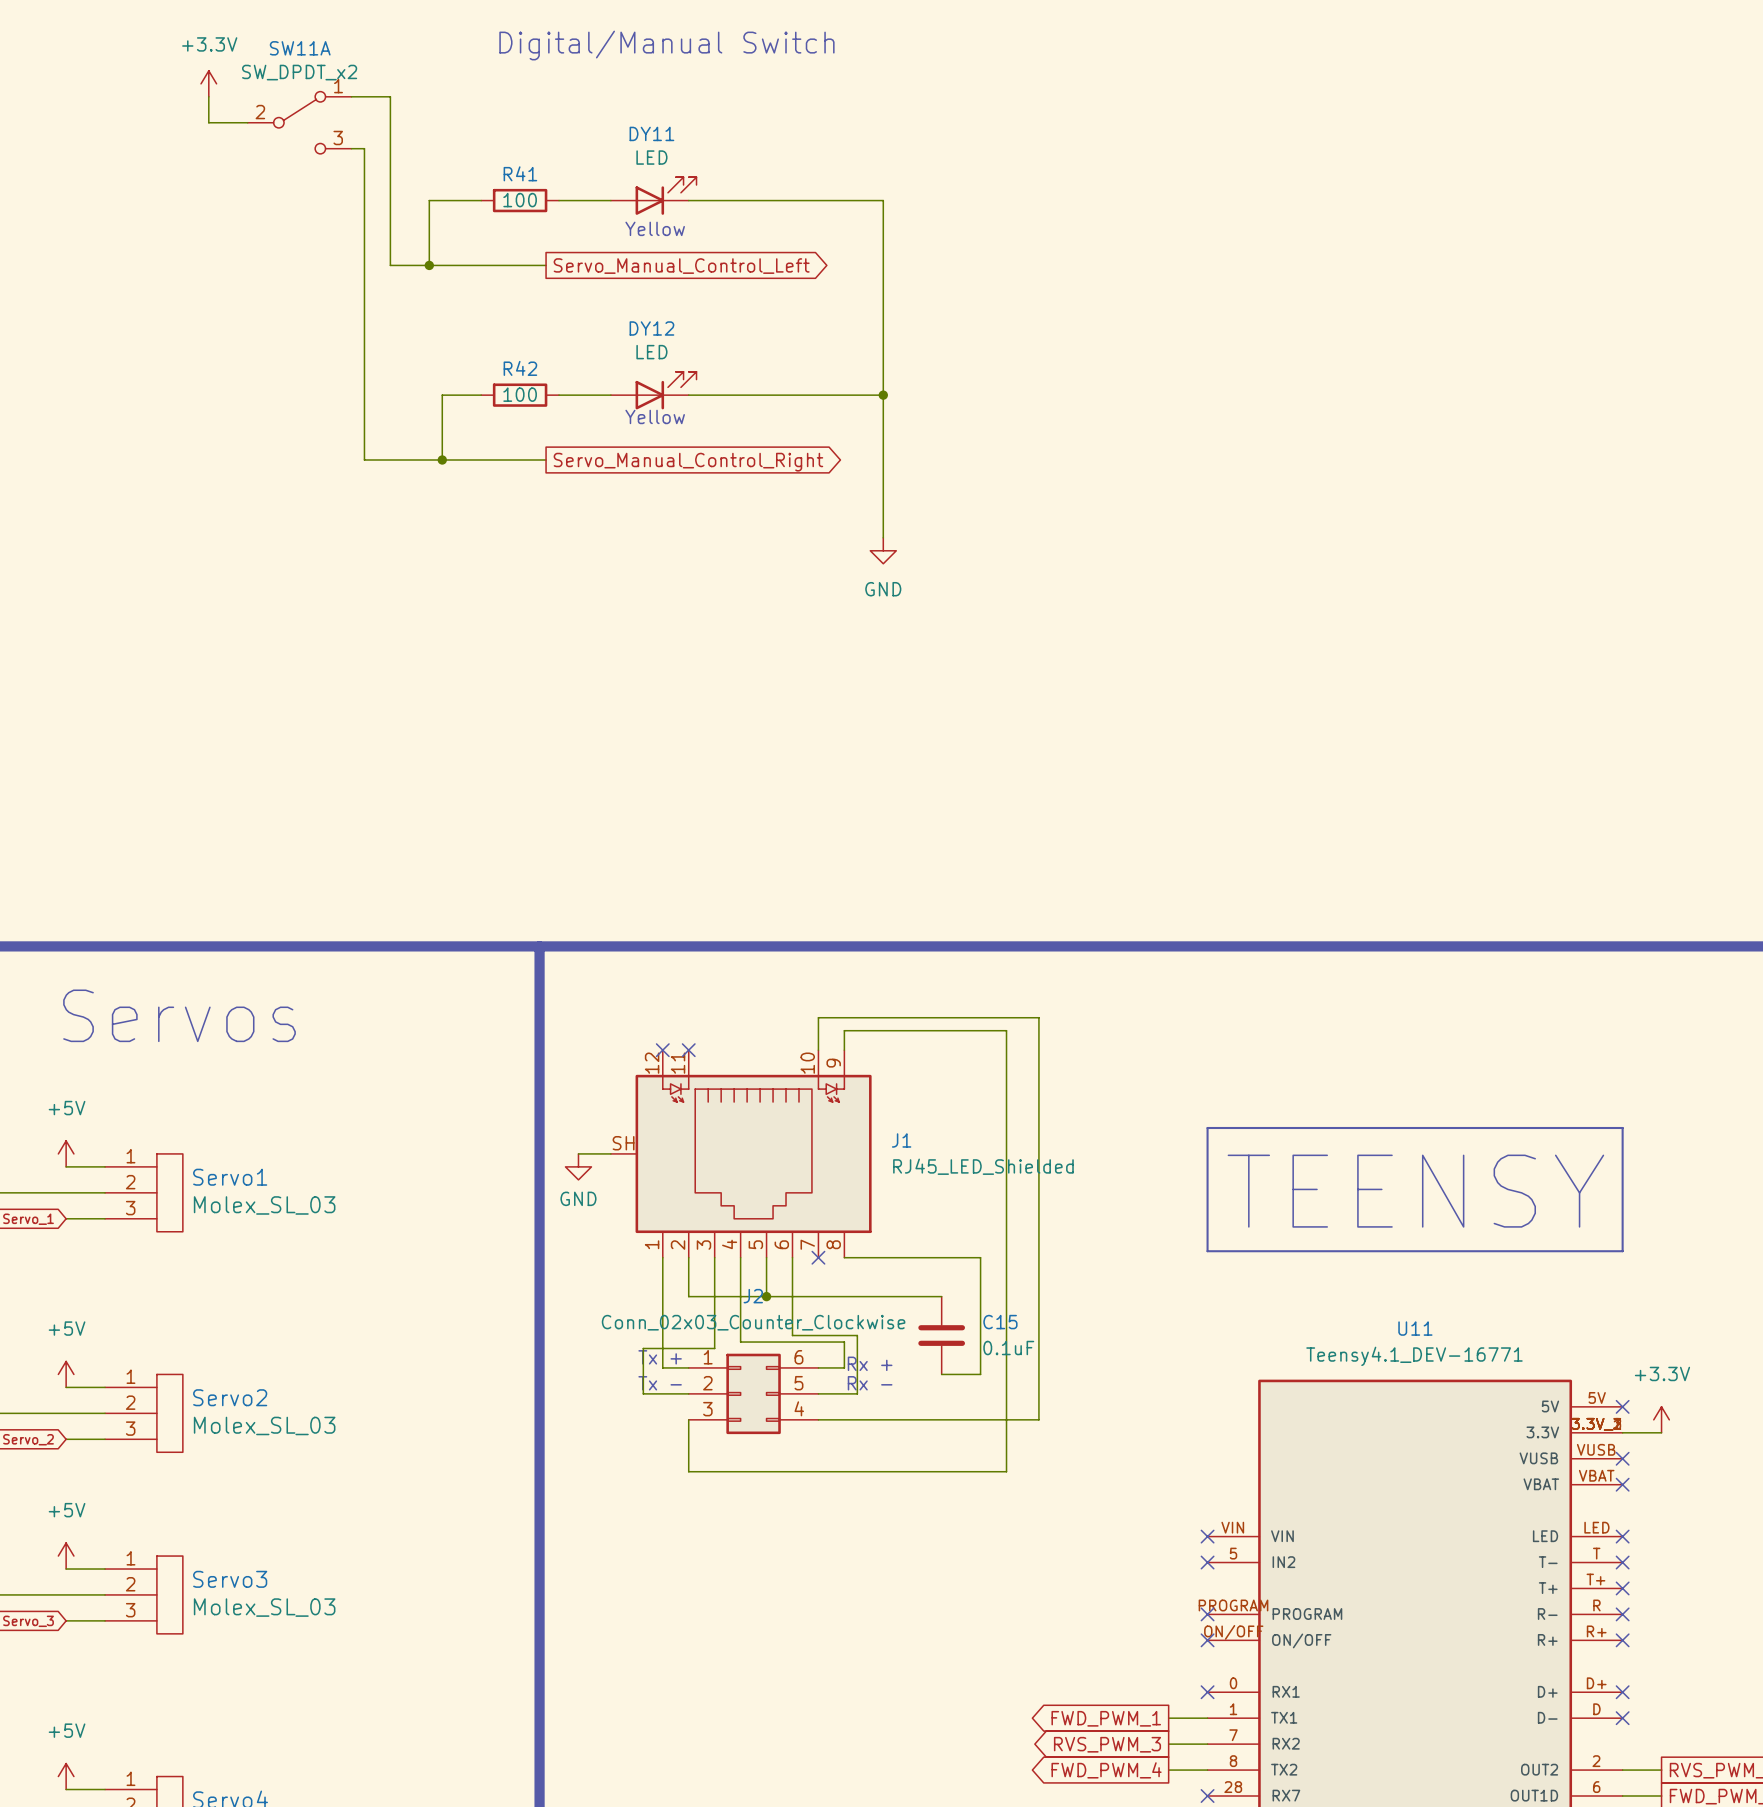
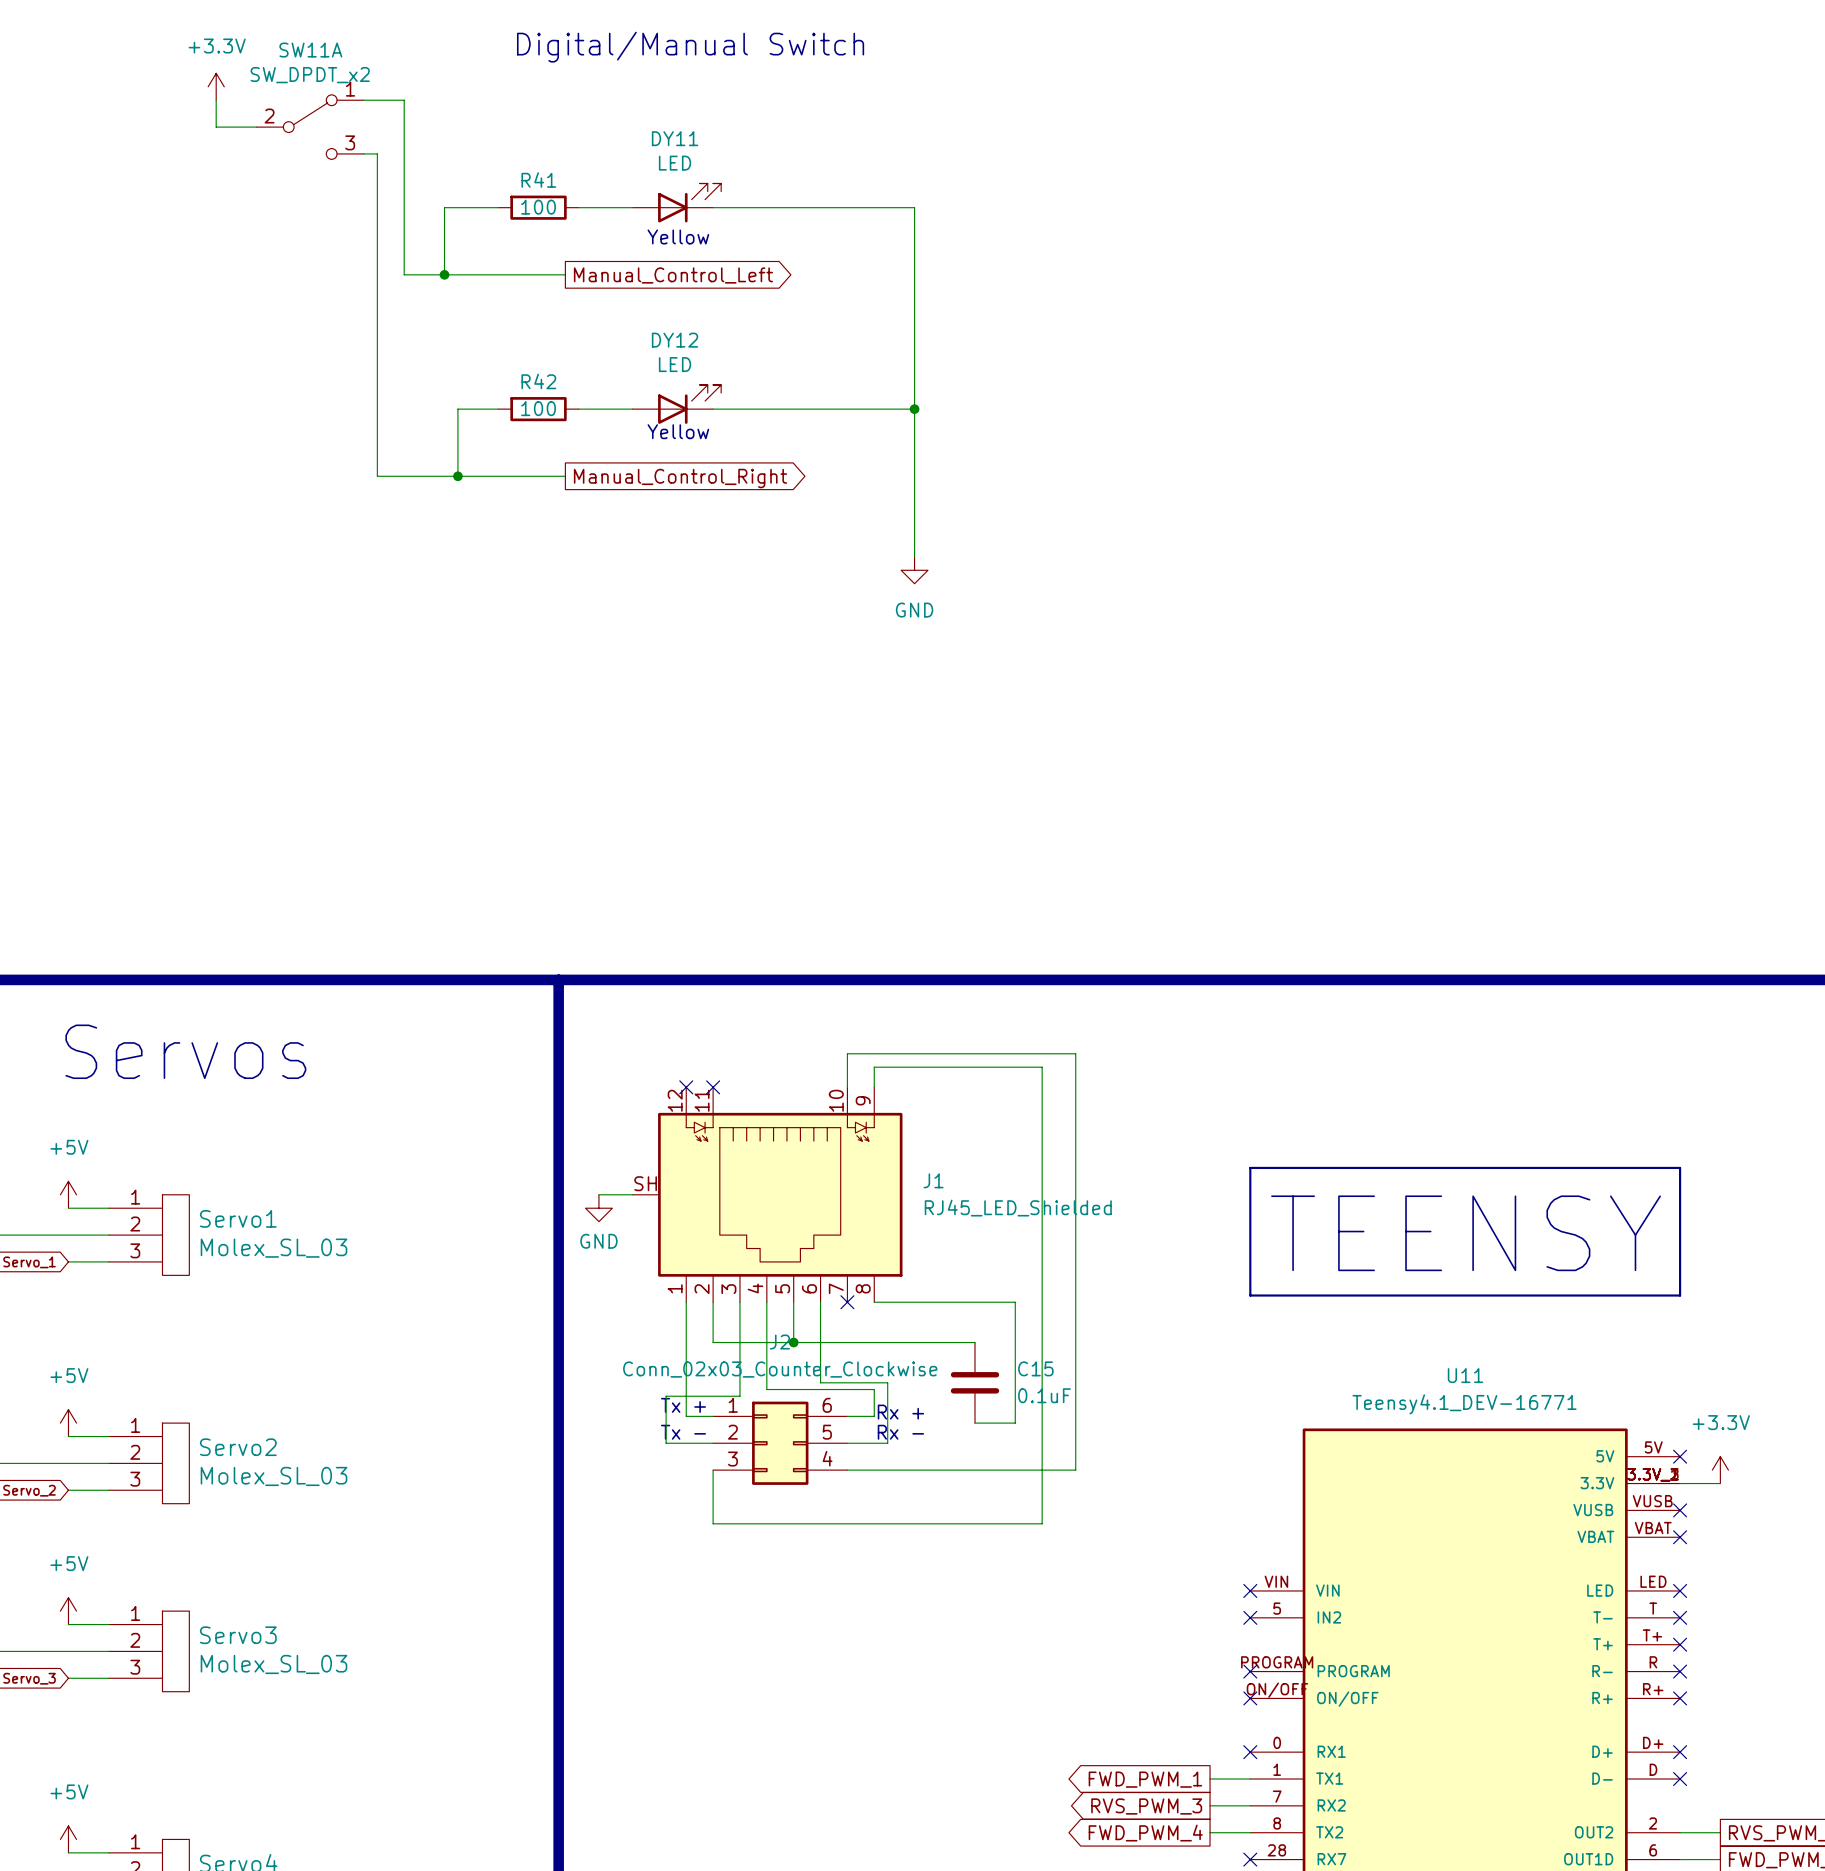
global label: Servo_Manual_Control_Left (681, 266) -> Manual_Control_Left (673, 275)
global label: Servo_Manual_Control_Right (688, 462) -> Manual_Control_Right (680, 478)

